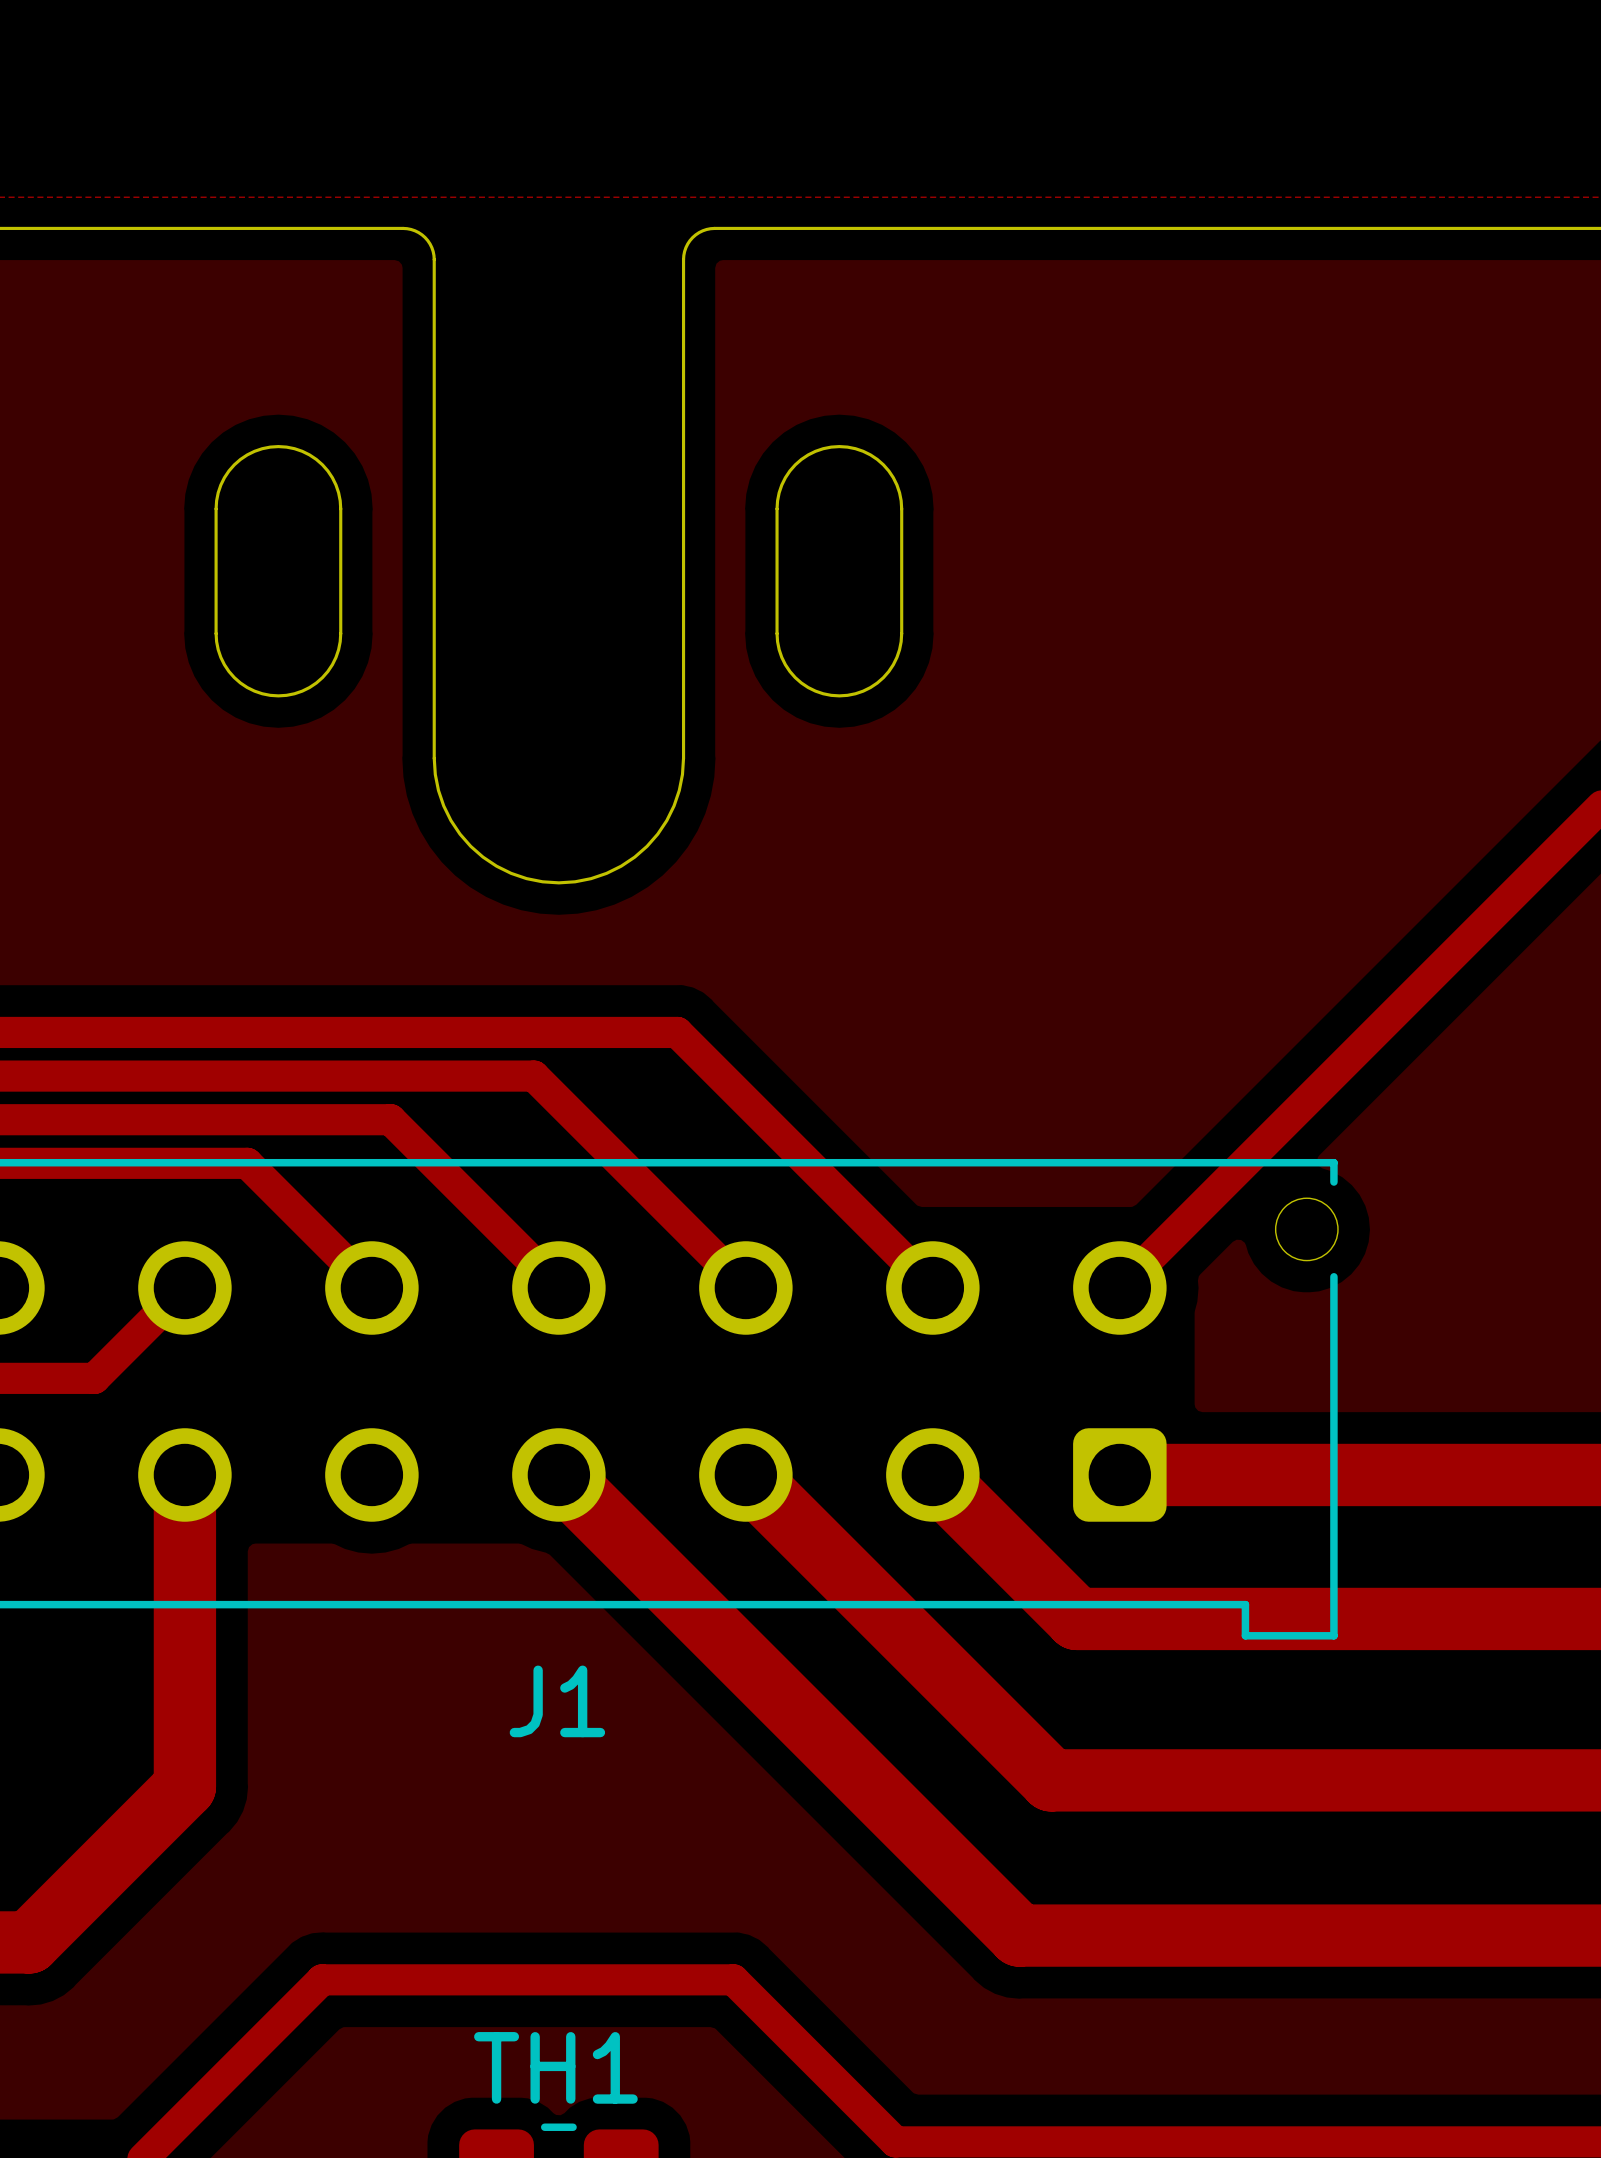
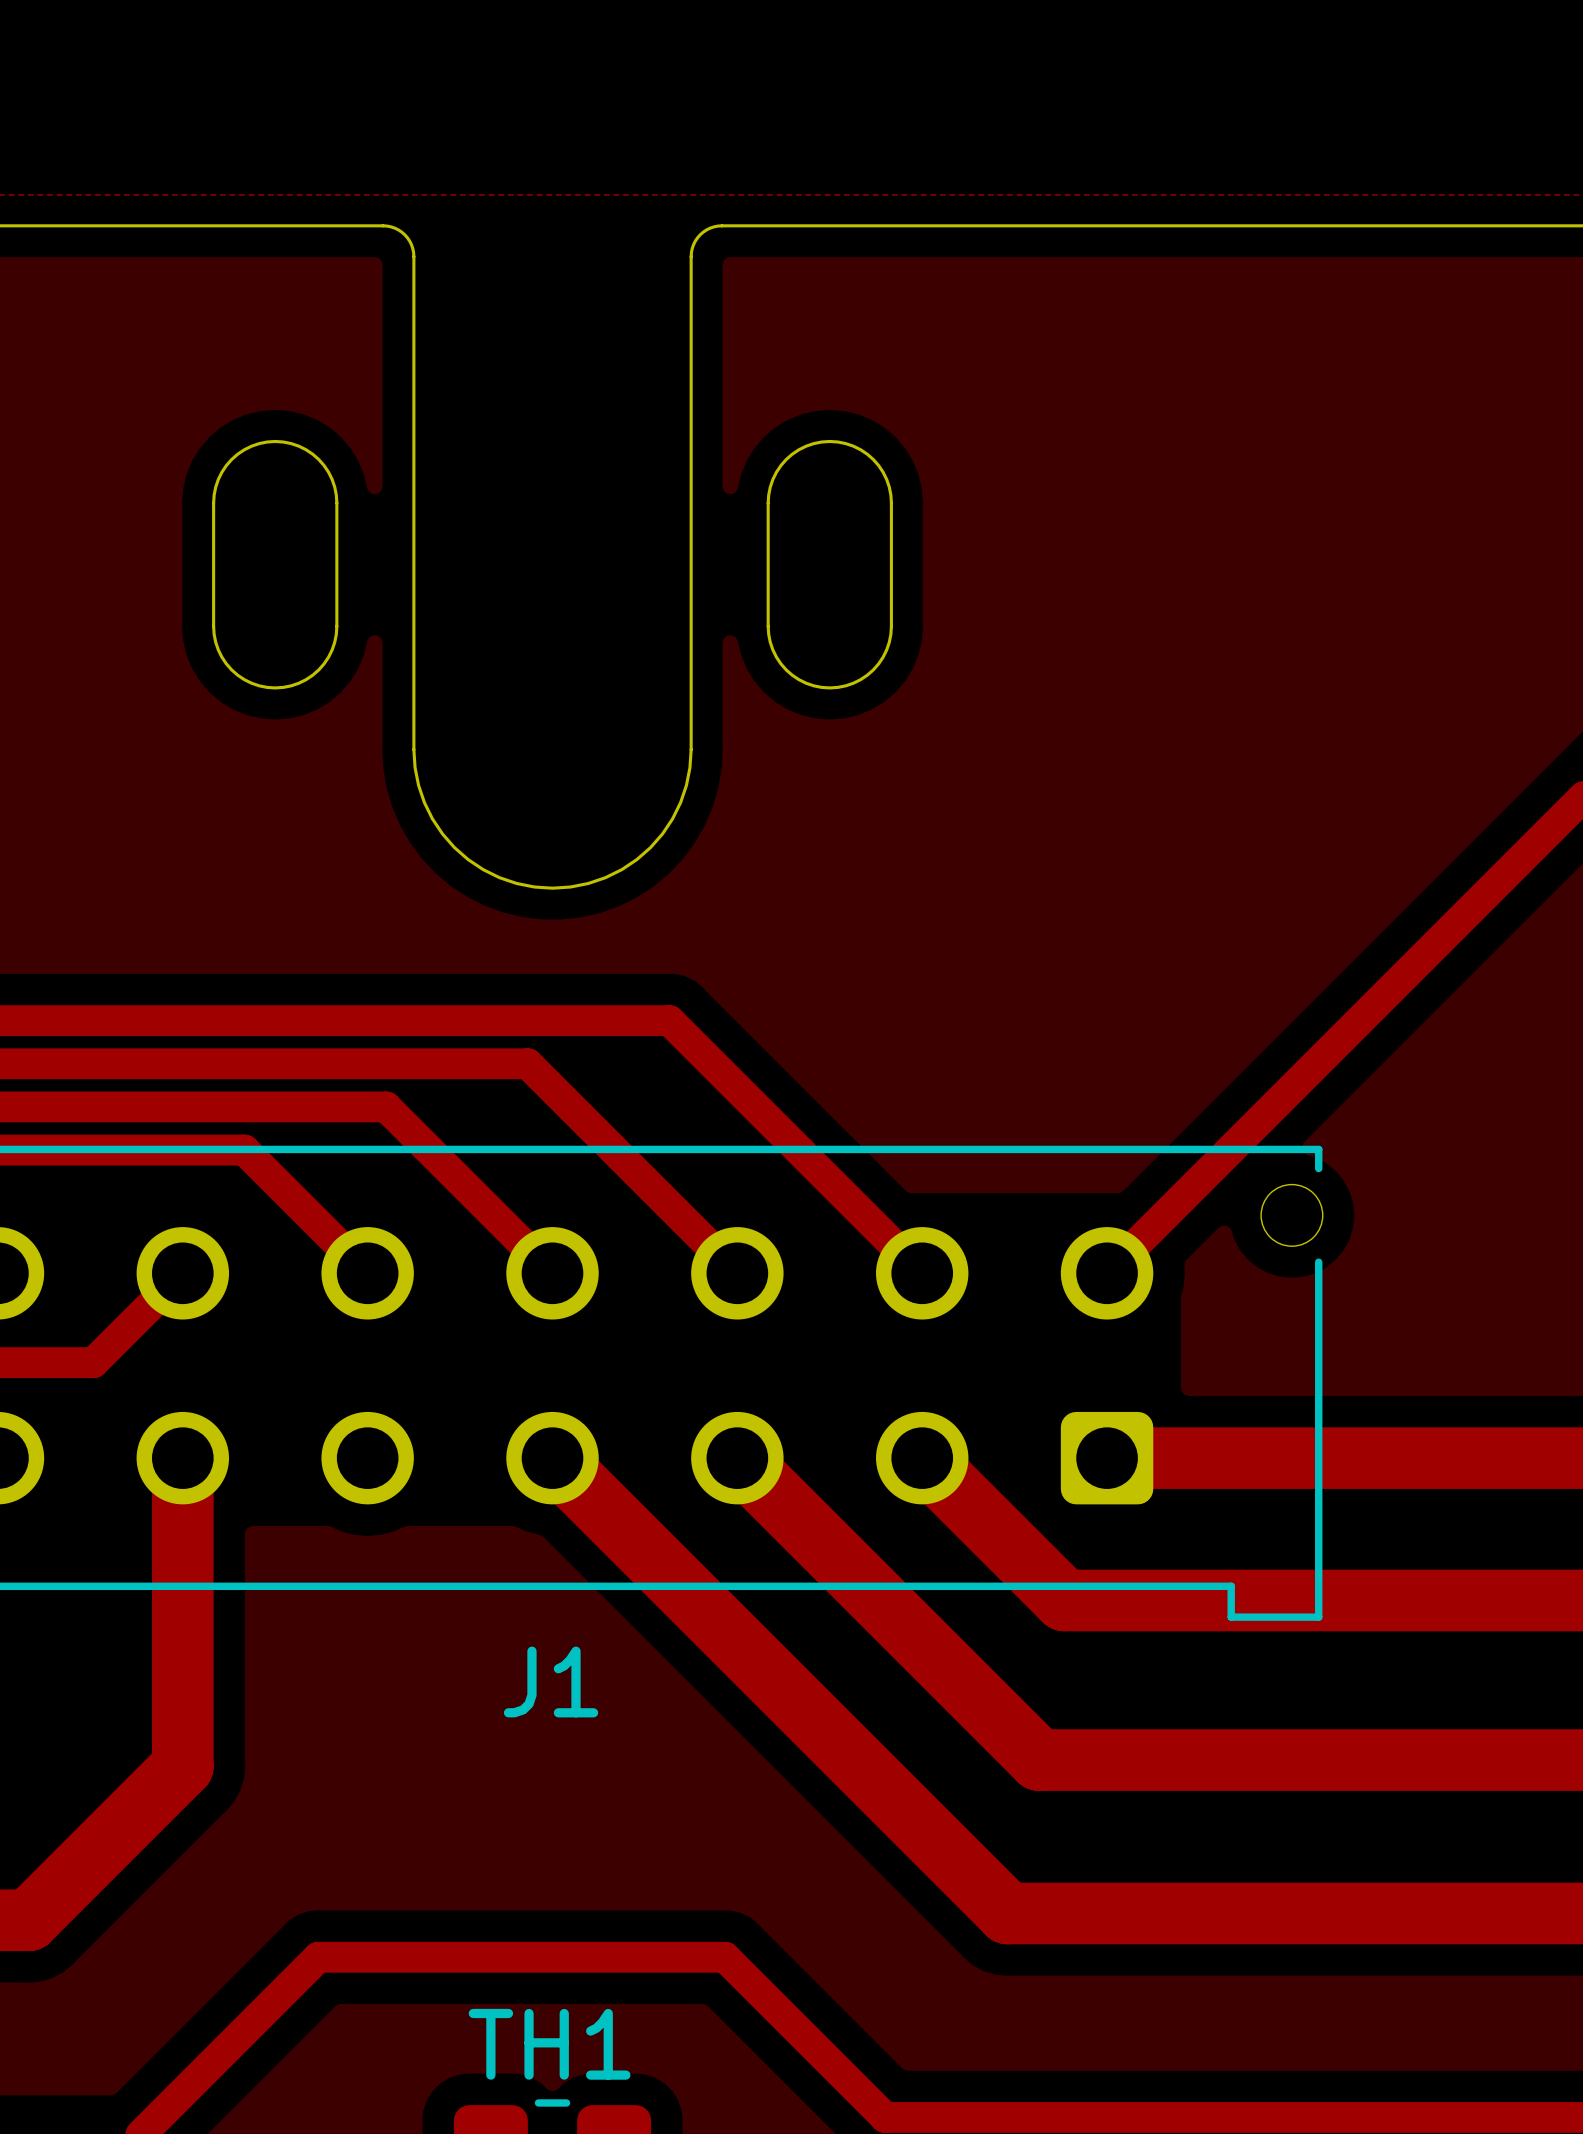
board edge: (387, 228) (407, 228) (418, 232) (427, 240) (433, 255) (434, 758) (438, 790) (450, 820) (459, 834) (483, 857) (511, 873) (526, 878) (558, 882) (591, 878) (606, 873) (634, 857) (657, 834) (666, 820) (679, 790) (683, 758) (683, 255) (687, 244) (699, 232) (710, 228) (730, 228) -> (383, 225) (394, 228) (404, 234) (411, 244) (413, 256) (413, 749) (418, 785) (424, 802) (442, 833) (468, 859) (499, 877) (516, 883) (552, 888) (588, 883) (605, 877) (636, 859) (662, 833) (680, 802) (686, 785) (691, 749) (691, 256) (693, 244) (700, 234) (710, 228) (721, 225)

